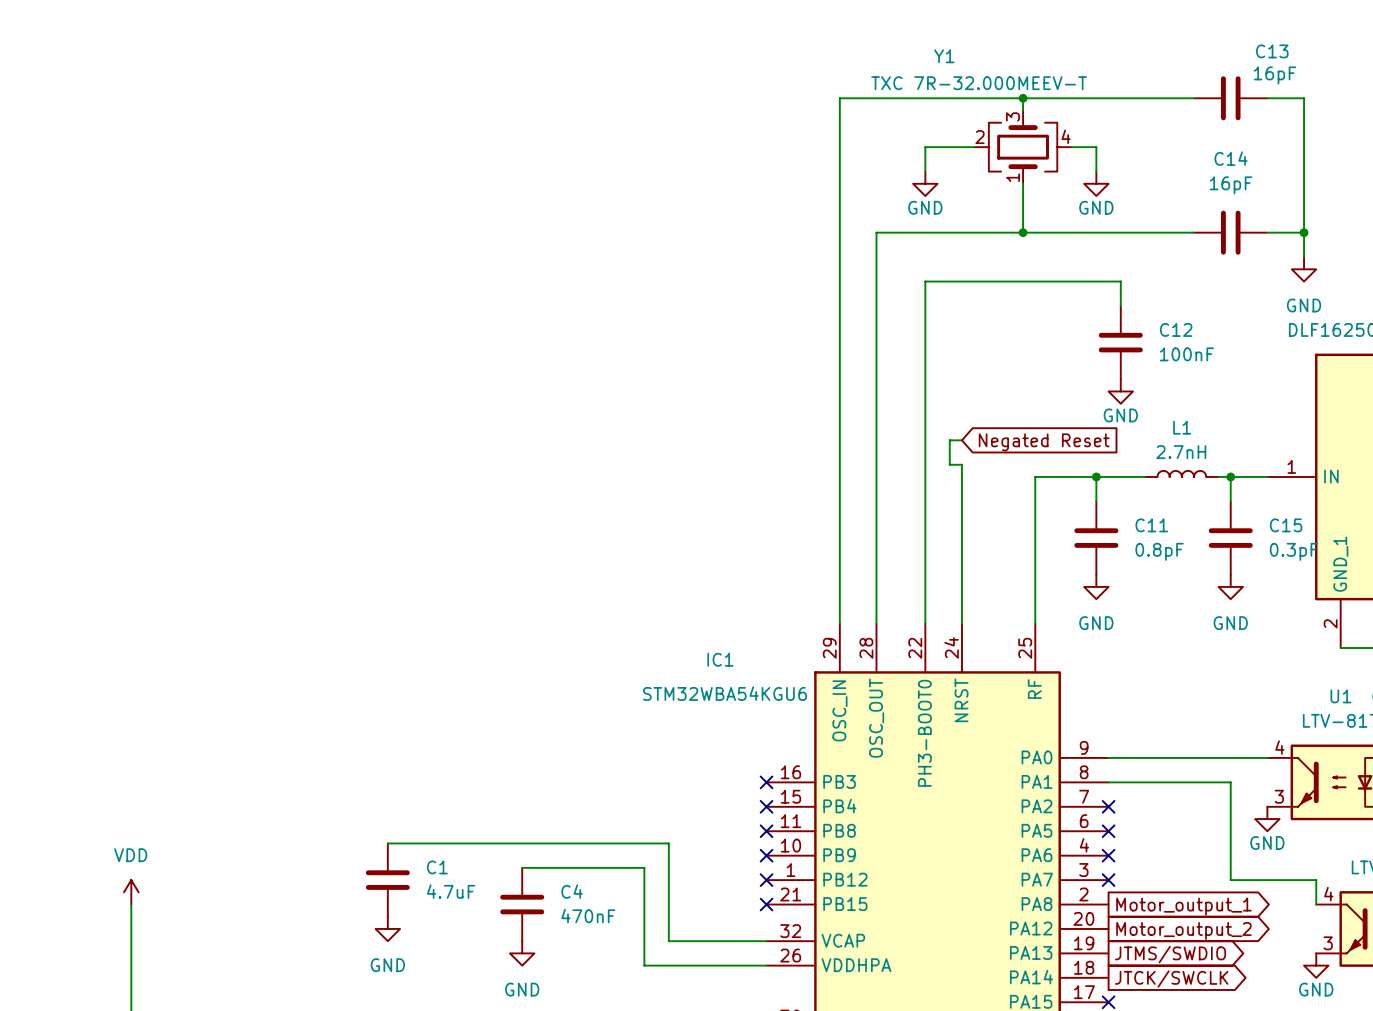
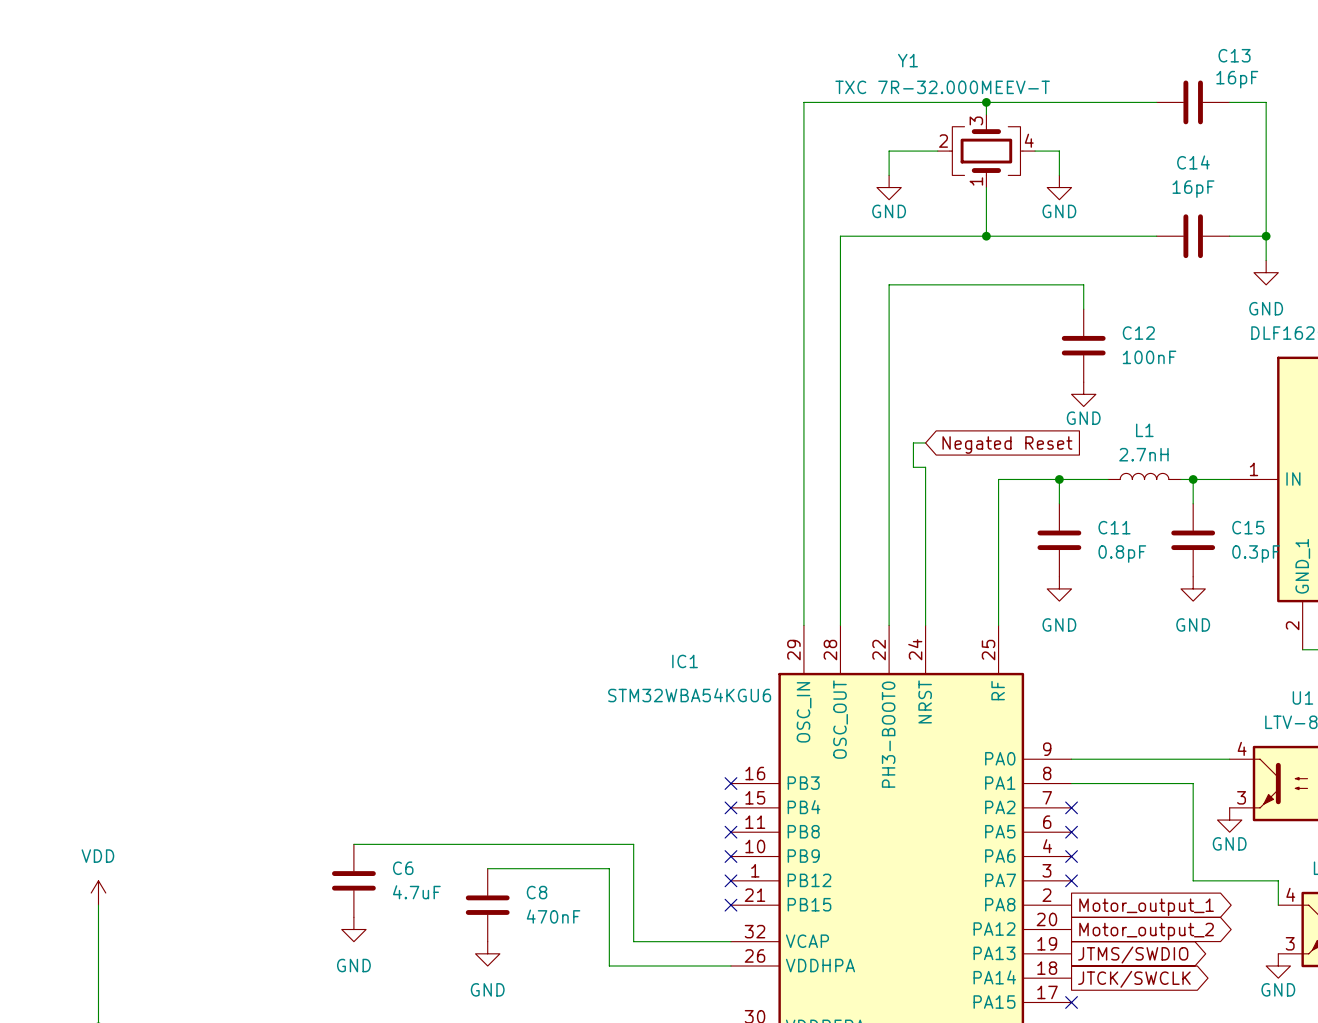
C1 name: C1 (437, 867) -> C6 (403, 868)
C4 name: C4 (572, 891) -> C8 (537, 892)

